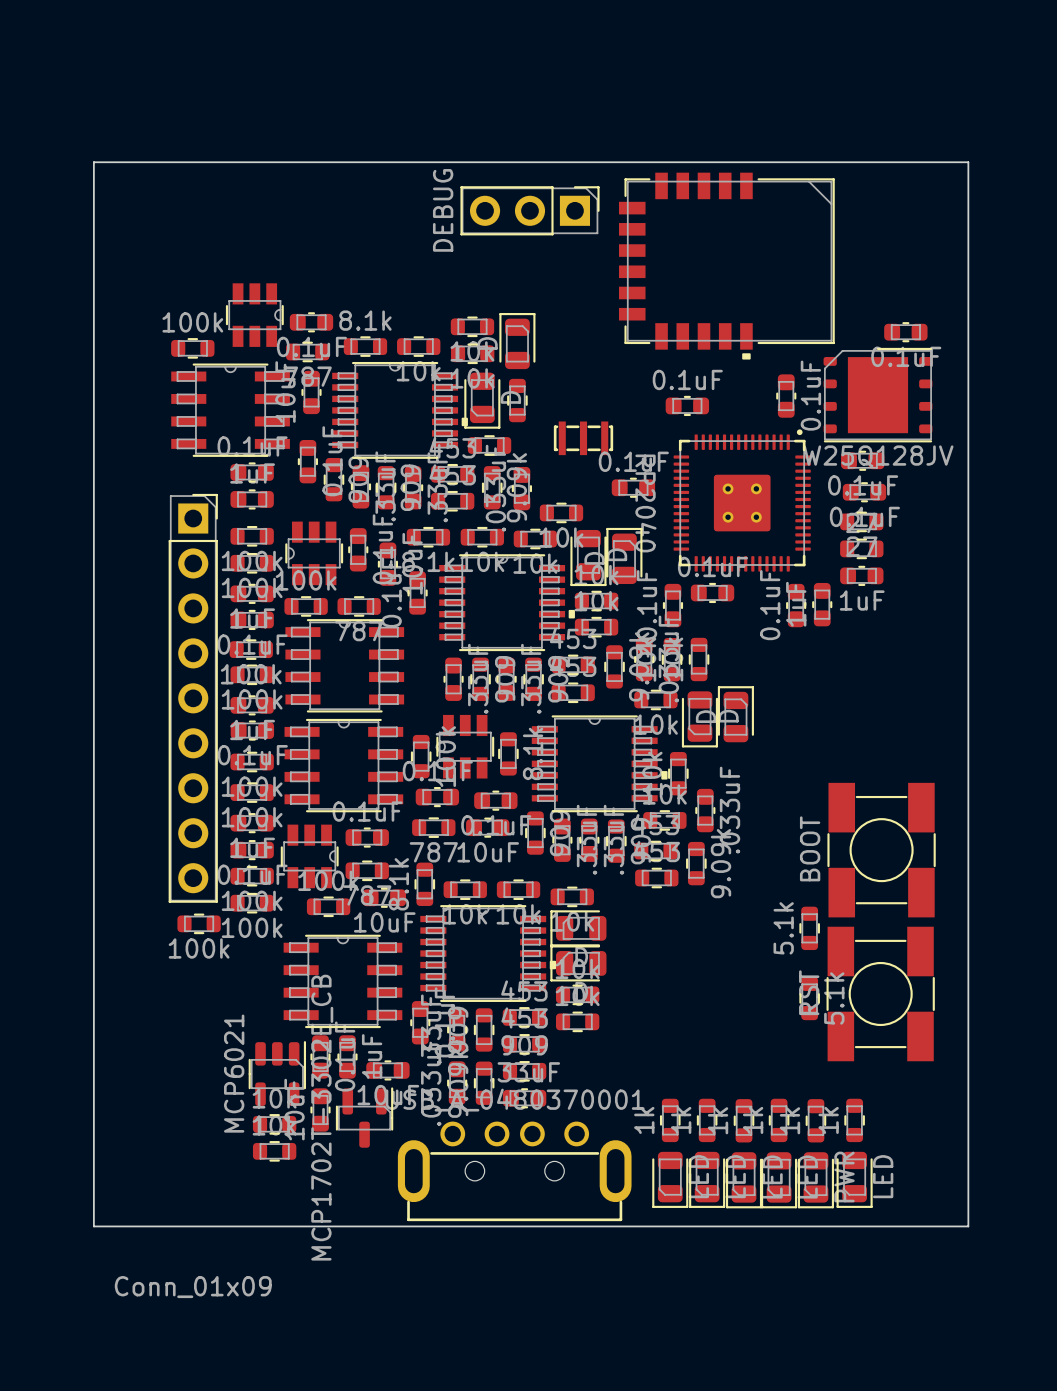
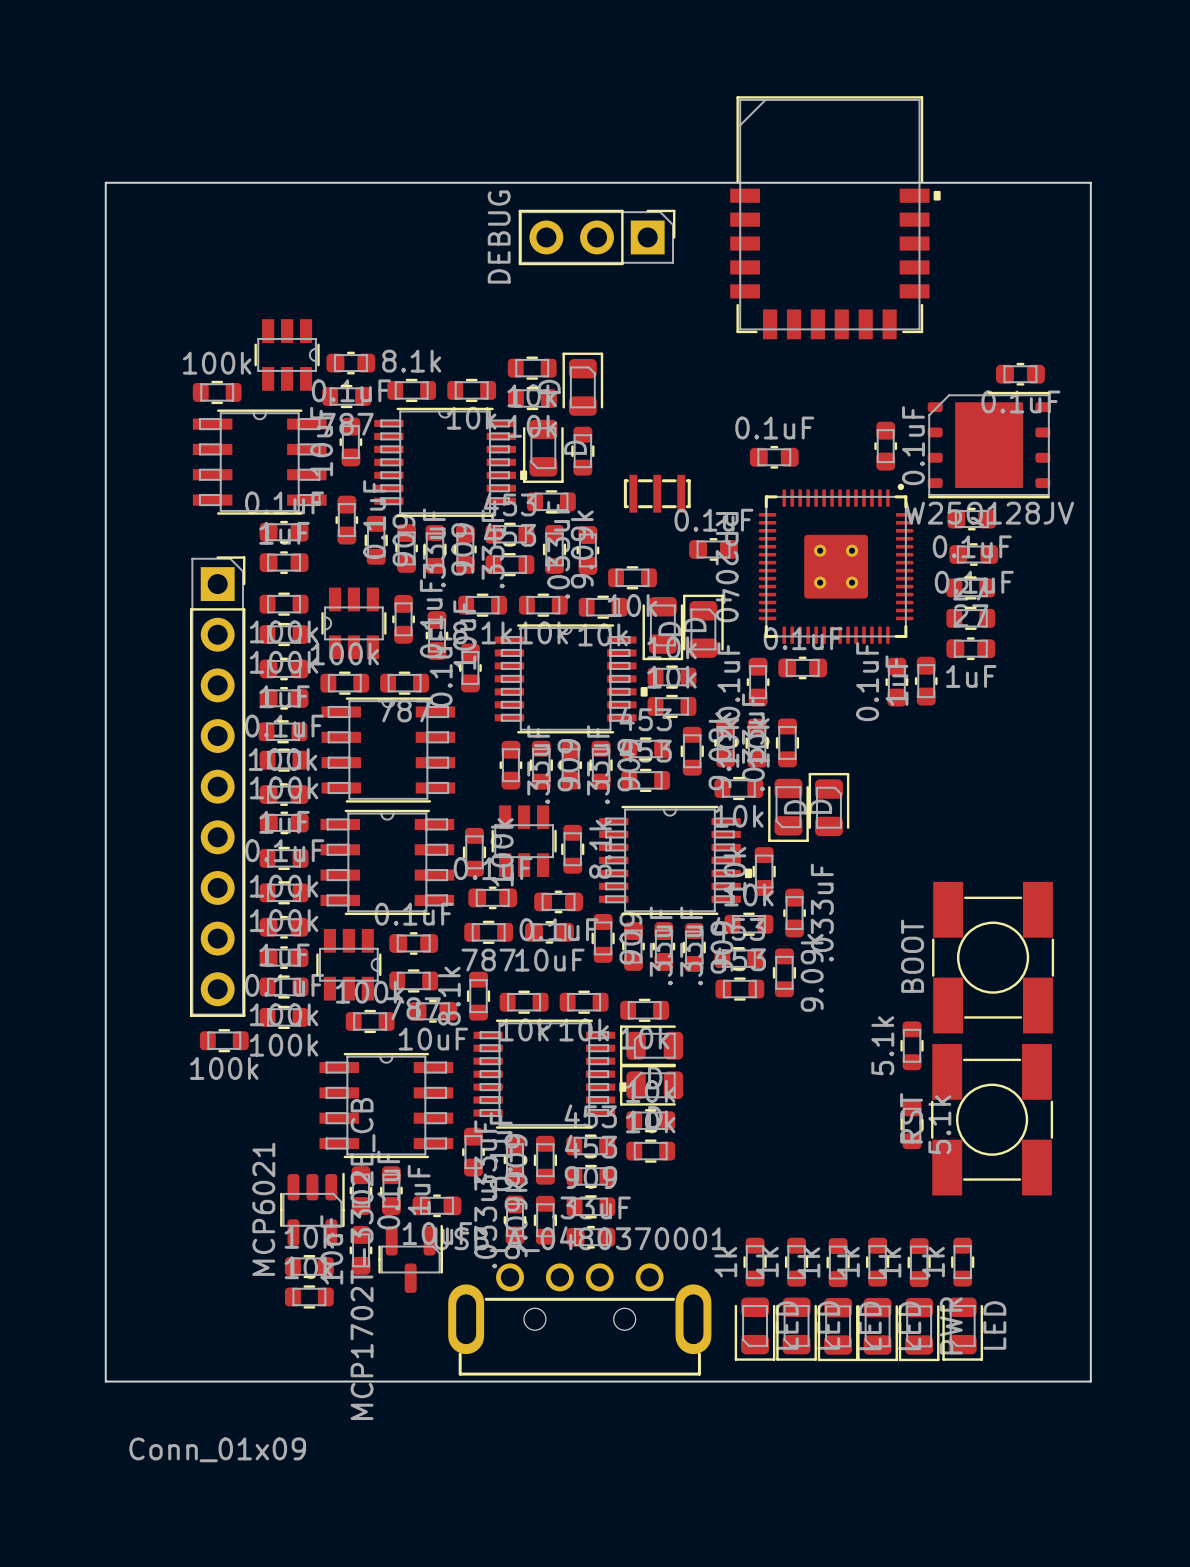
part rotation: 0° (726, 266) -> 90° counterclockwise (835, 217)

